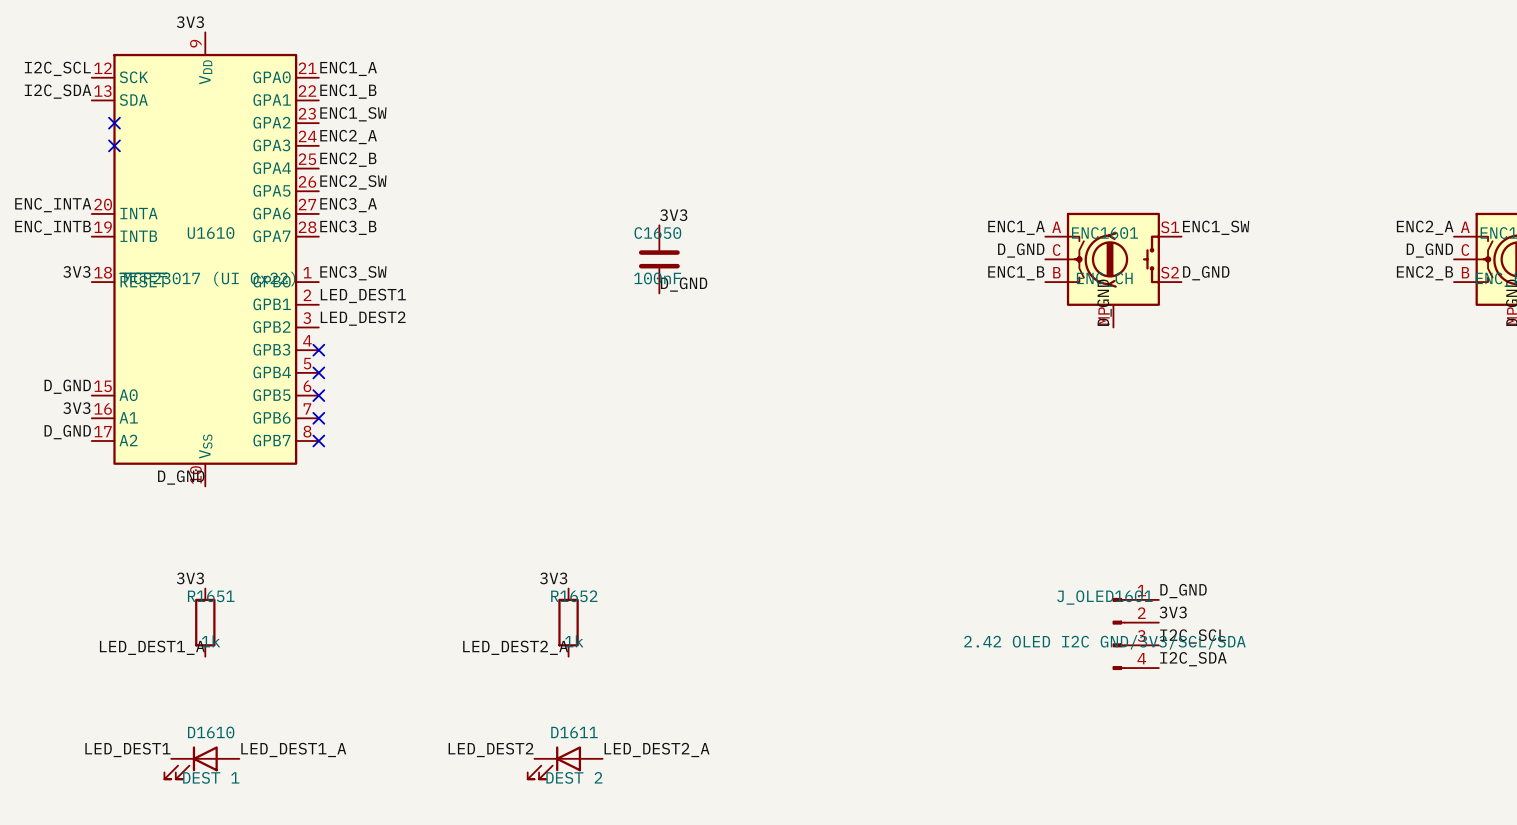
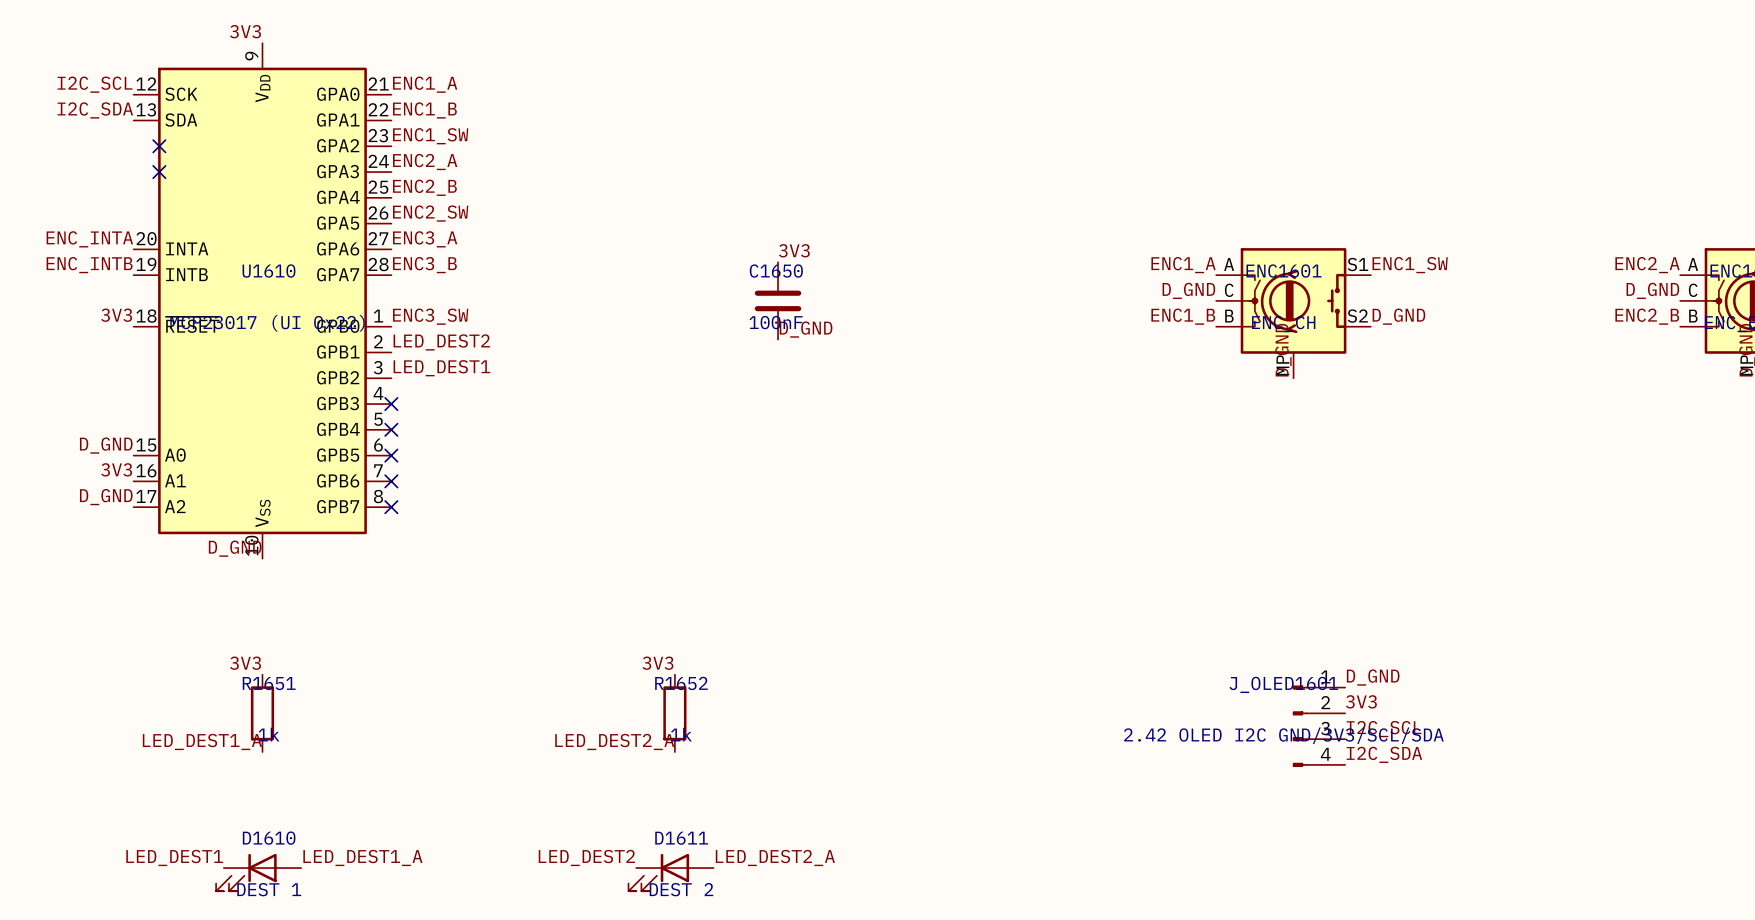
label: LED_DEST1 (363, 295) -> LED_DEST2 (441, 342)
label: LED_DEST2 (363, 318) -> LED_DEST1 (441, 368)

